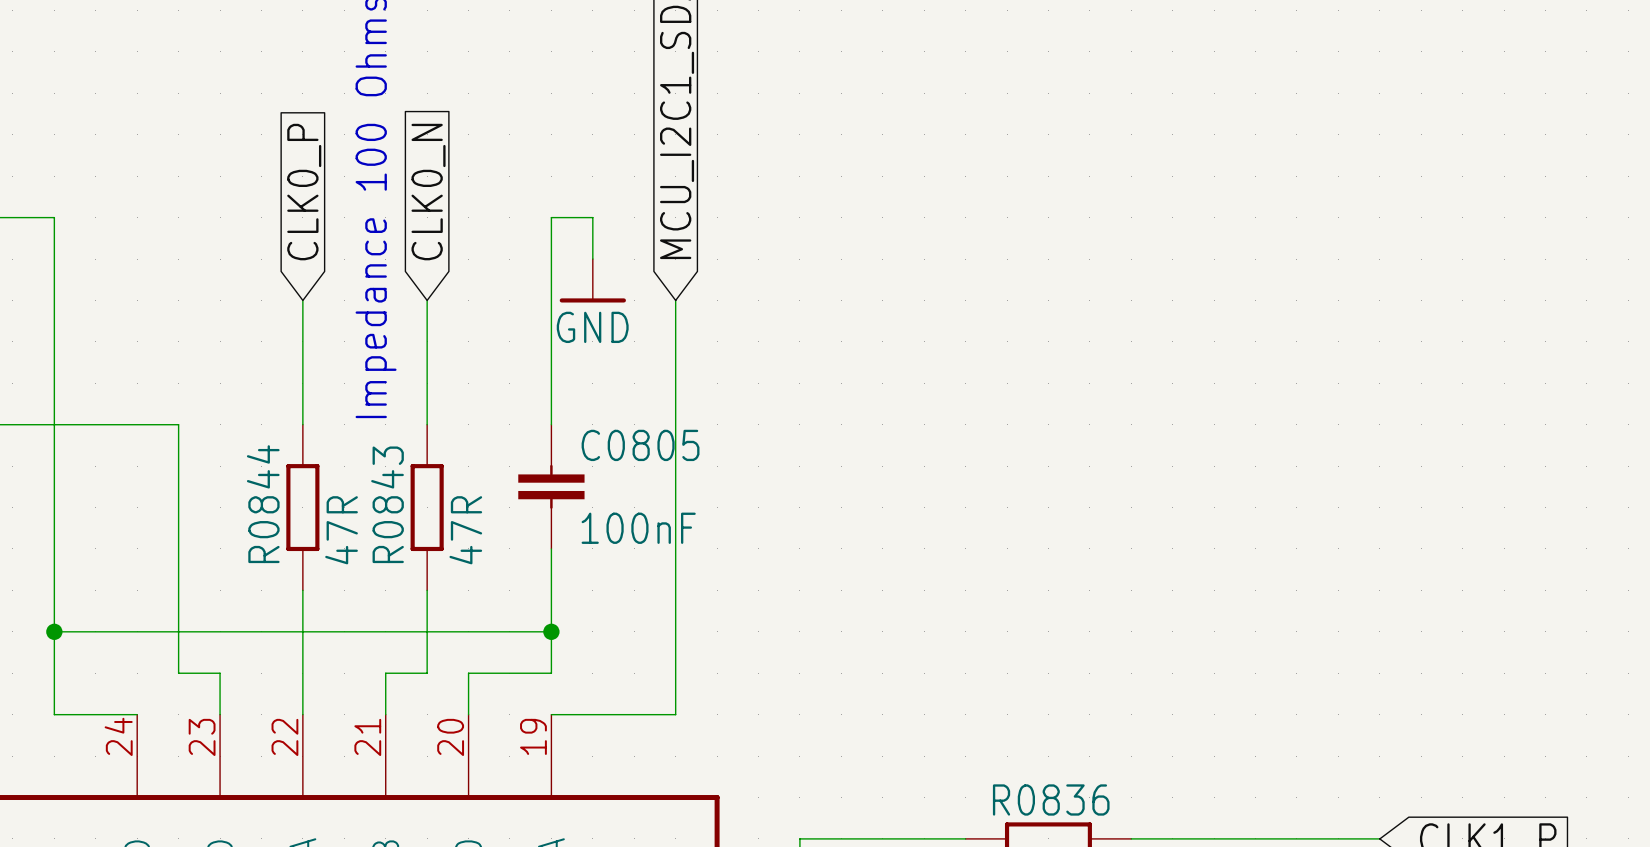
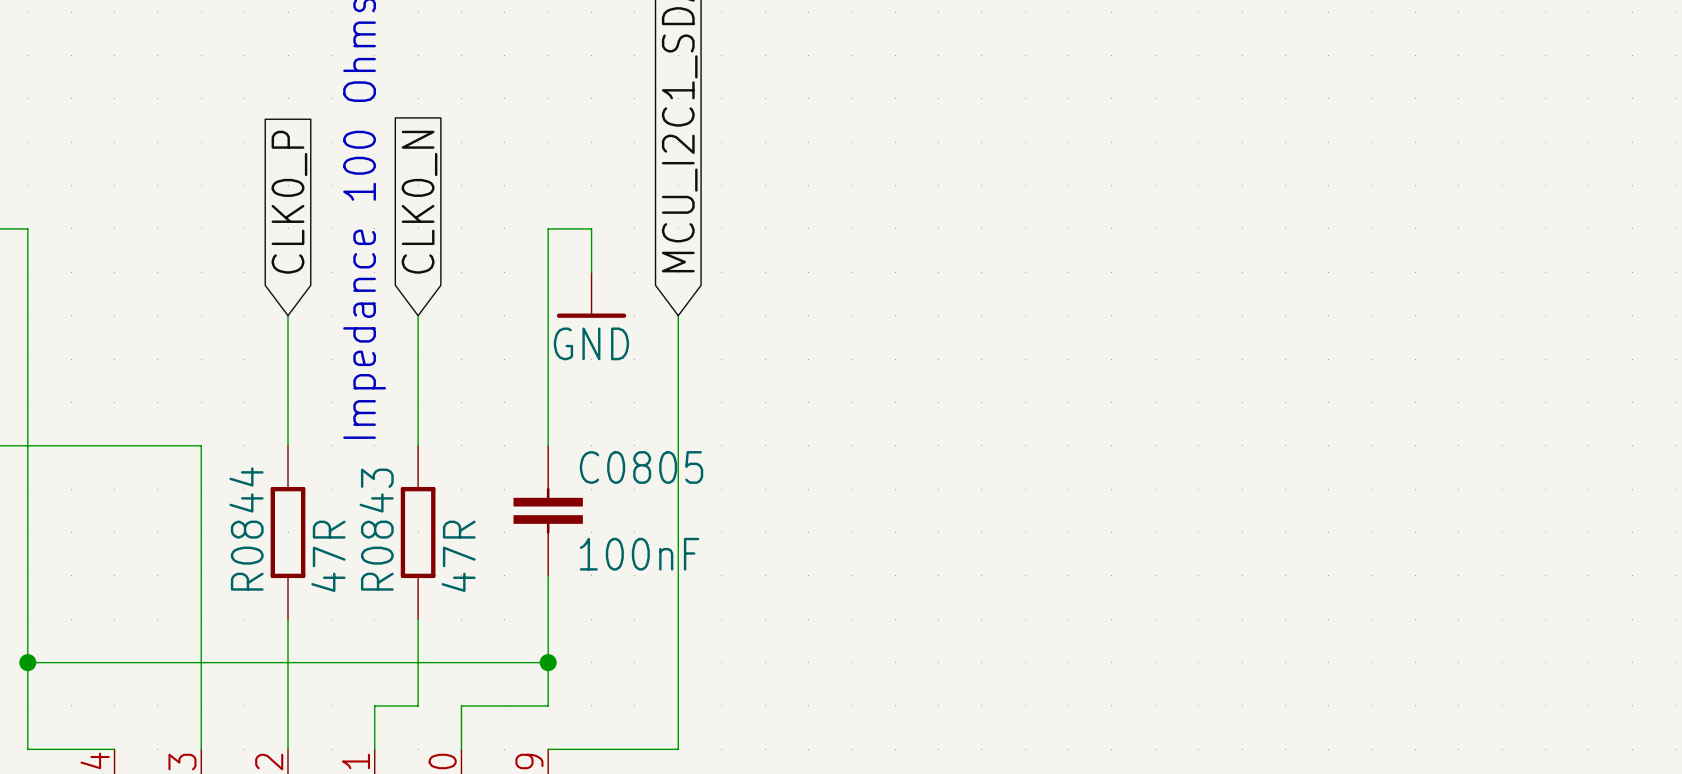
wire: (178, 424) (178, 673) (220, 673) -> (157, 445) (201, 445) (201, 705)

